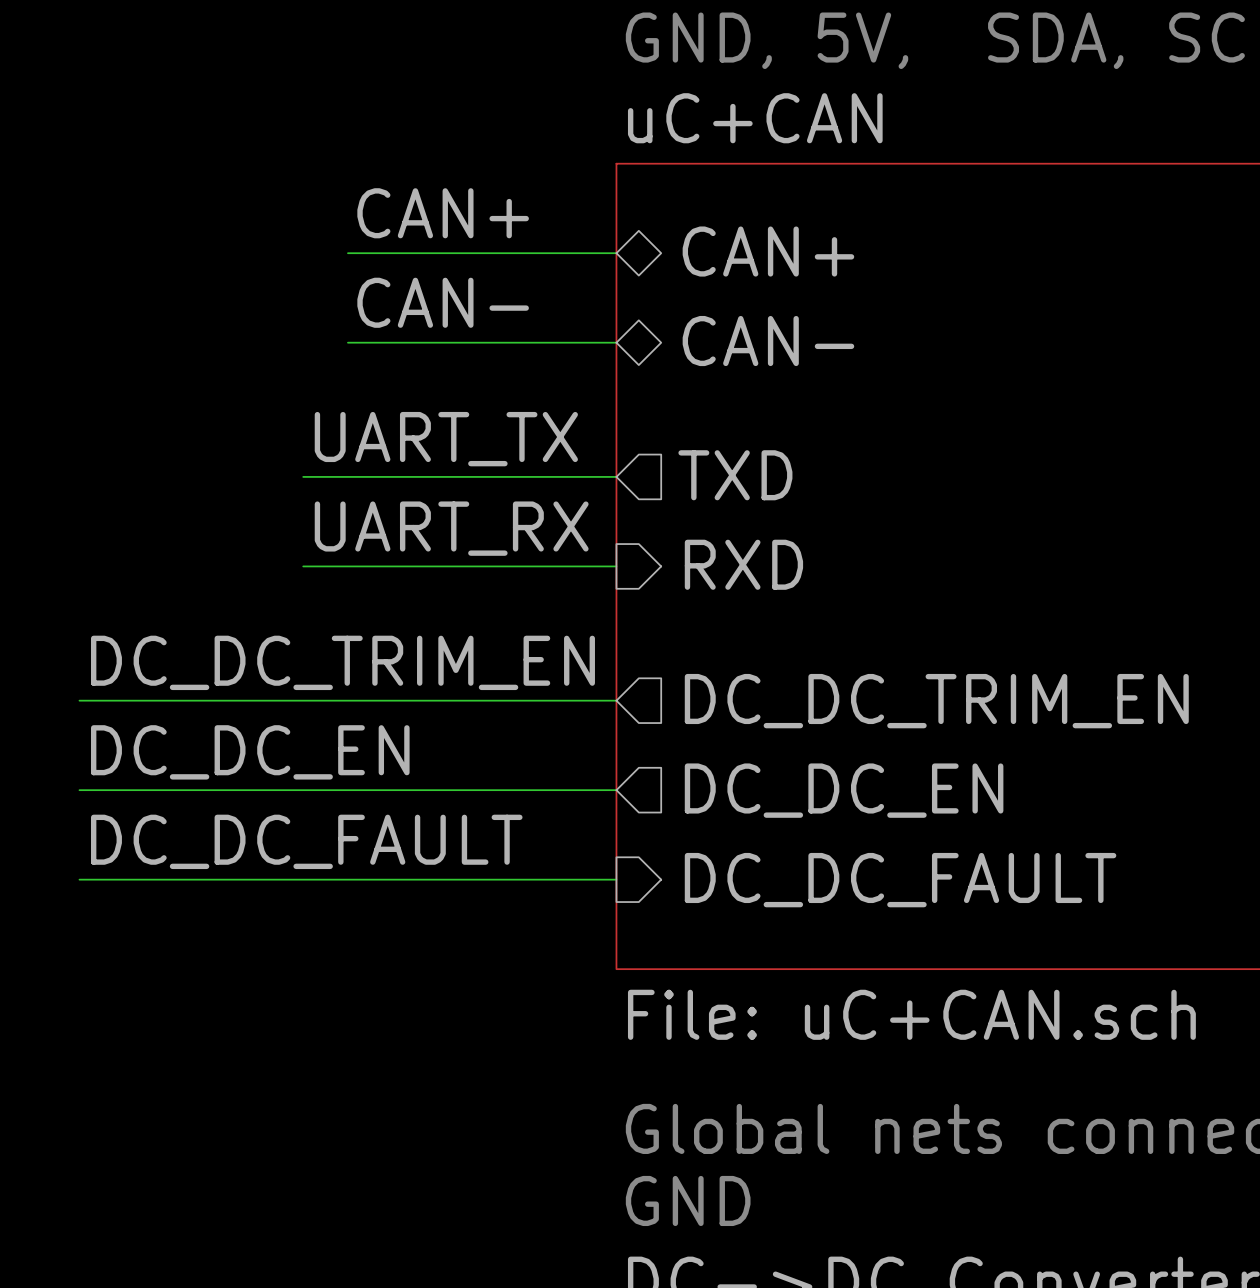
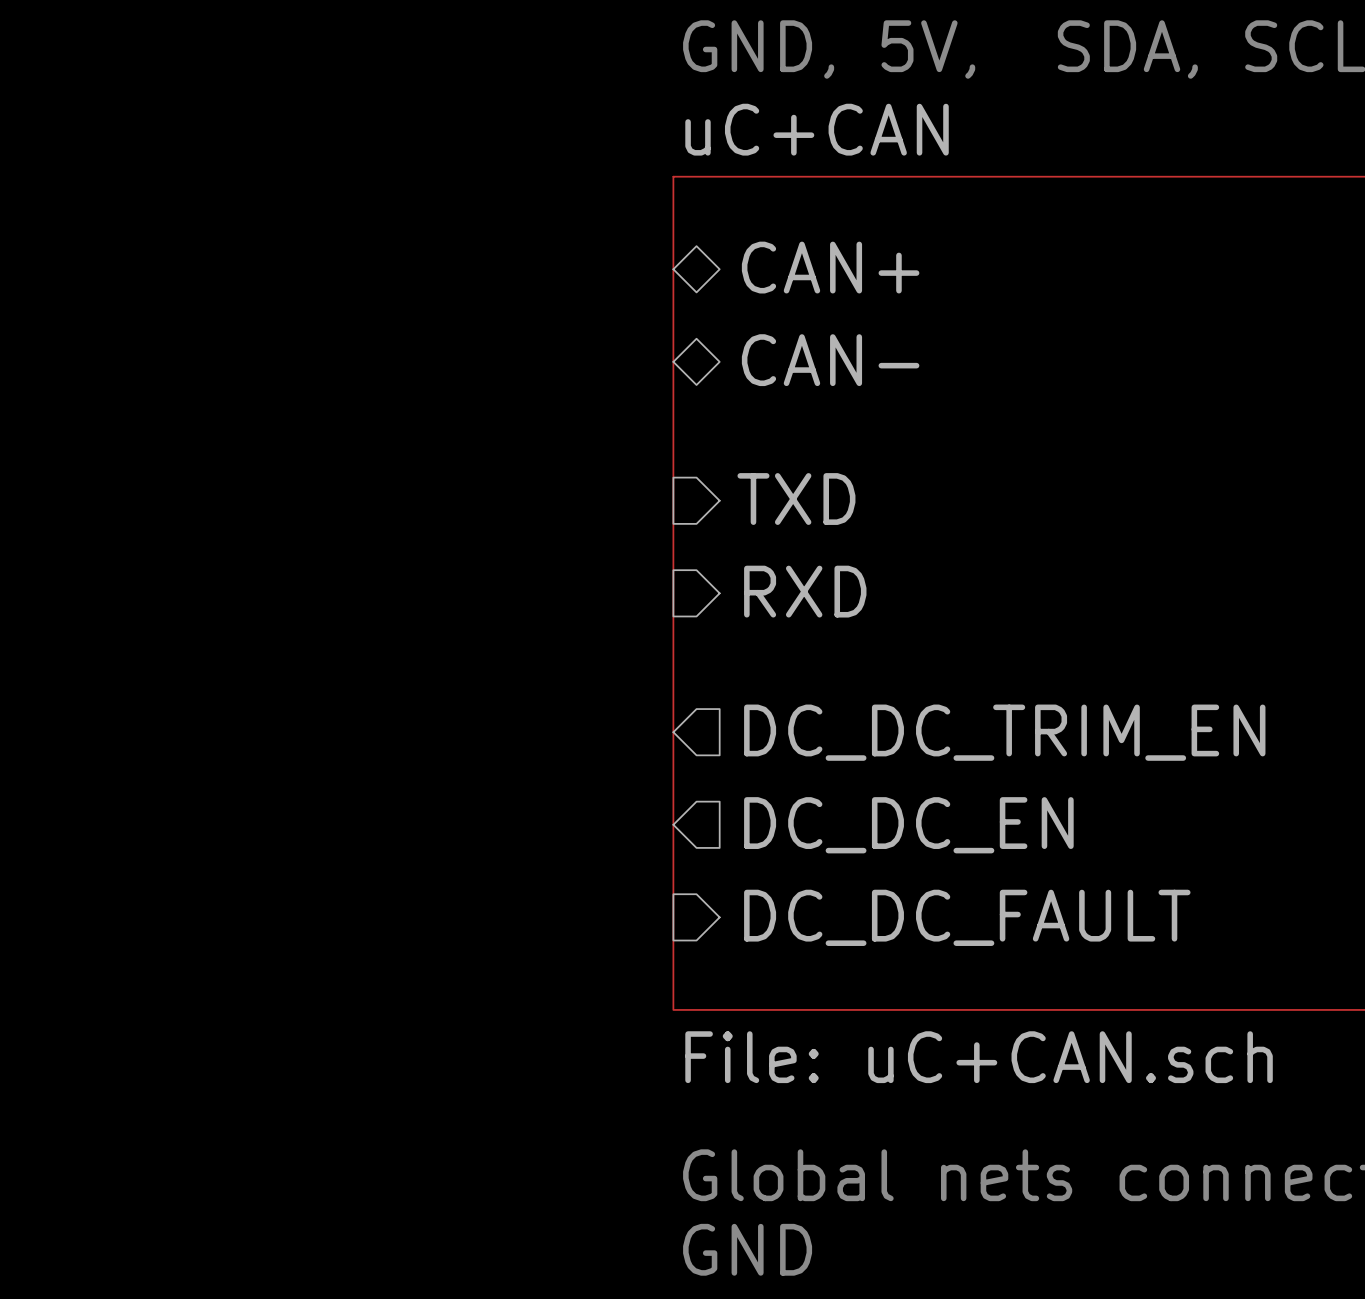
label: CAN+ (443, 213) -> none
wire: (347, 253) (616, 253) -> none
label: CAN- (443, 302) -> none
wire: (347, 342) (616, 342) -> none
label: UART_TX (446, 439) -> none
sheet pin shape: output (735, 475) -> input (796, 499)
wire: (303, 476) (616, 476) -> none
label: UART_RX (451, 528) -> none
wire: (303, 566) (616, 566) -> none
label: DC_DC_TRIM_EN (342, 662) -> none
wire: (79, 700) (616, 700) -> none
label: DC_DC_EN (250, 752) -> none
wire: (79, 790) (616, 790) -> none
label: DC_DC_FAULT (306, 841) -> none
wire: (79, 879) (616, 879) -> none

